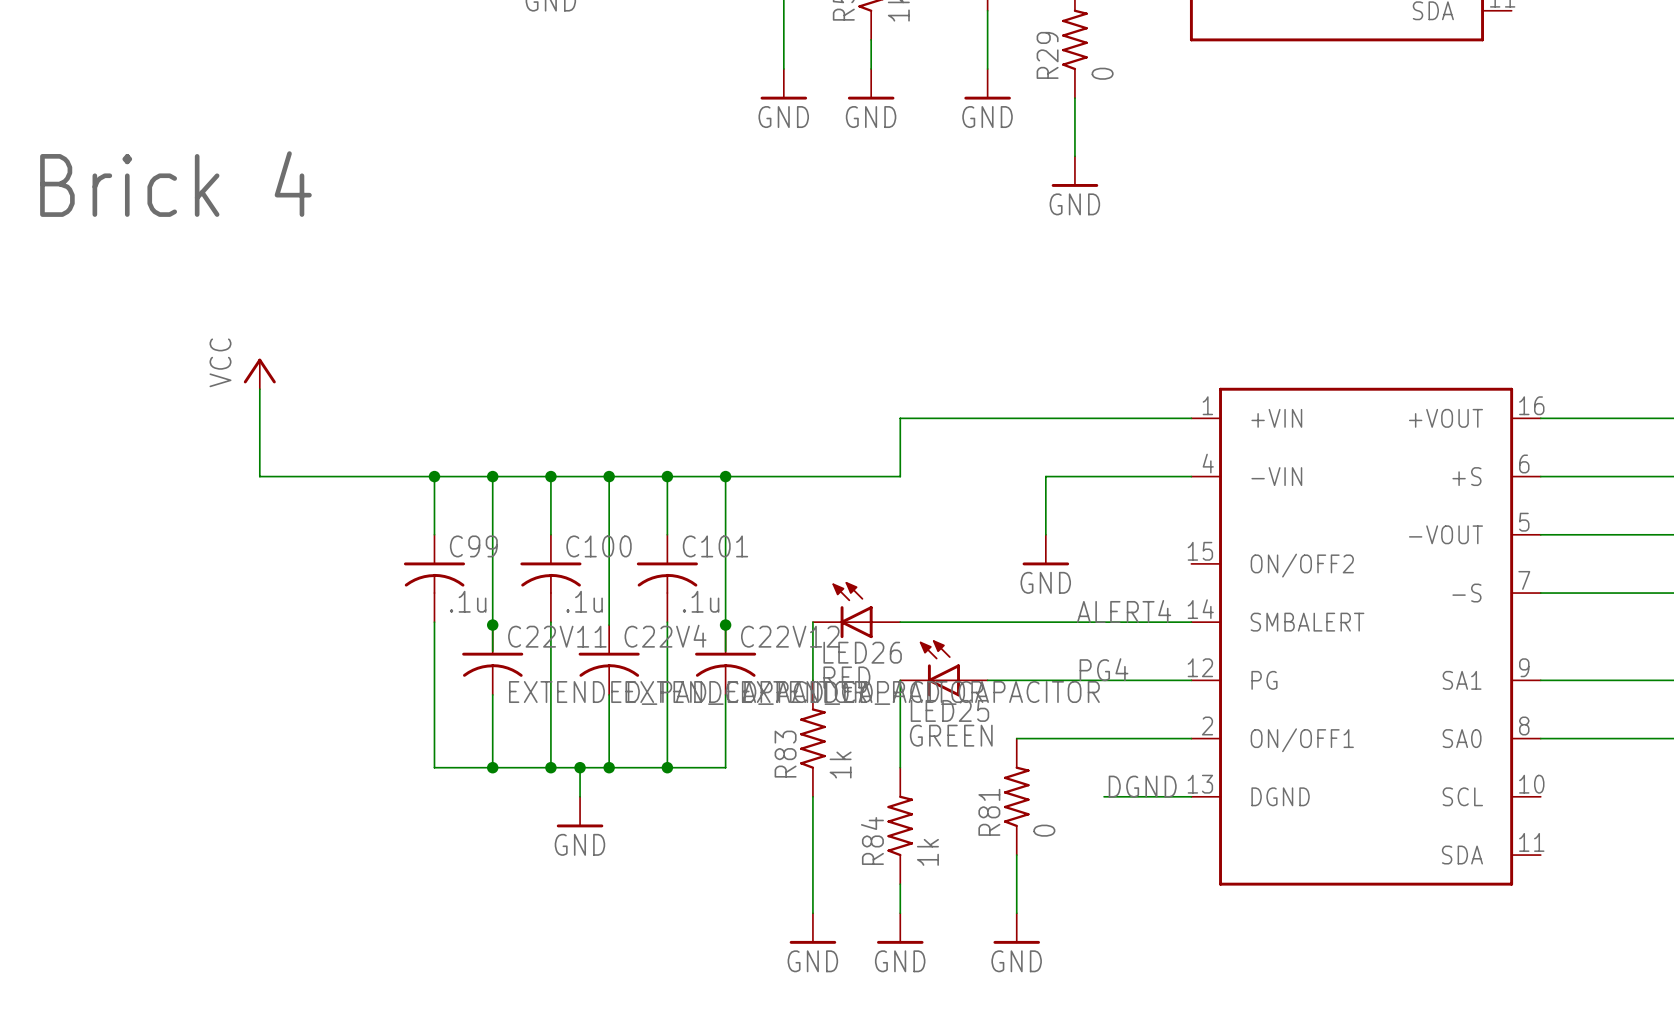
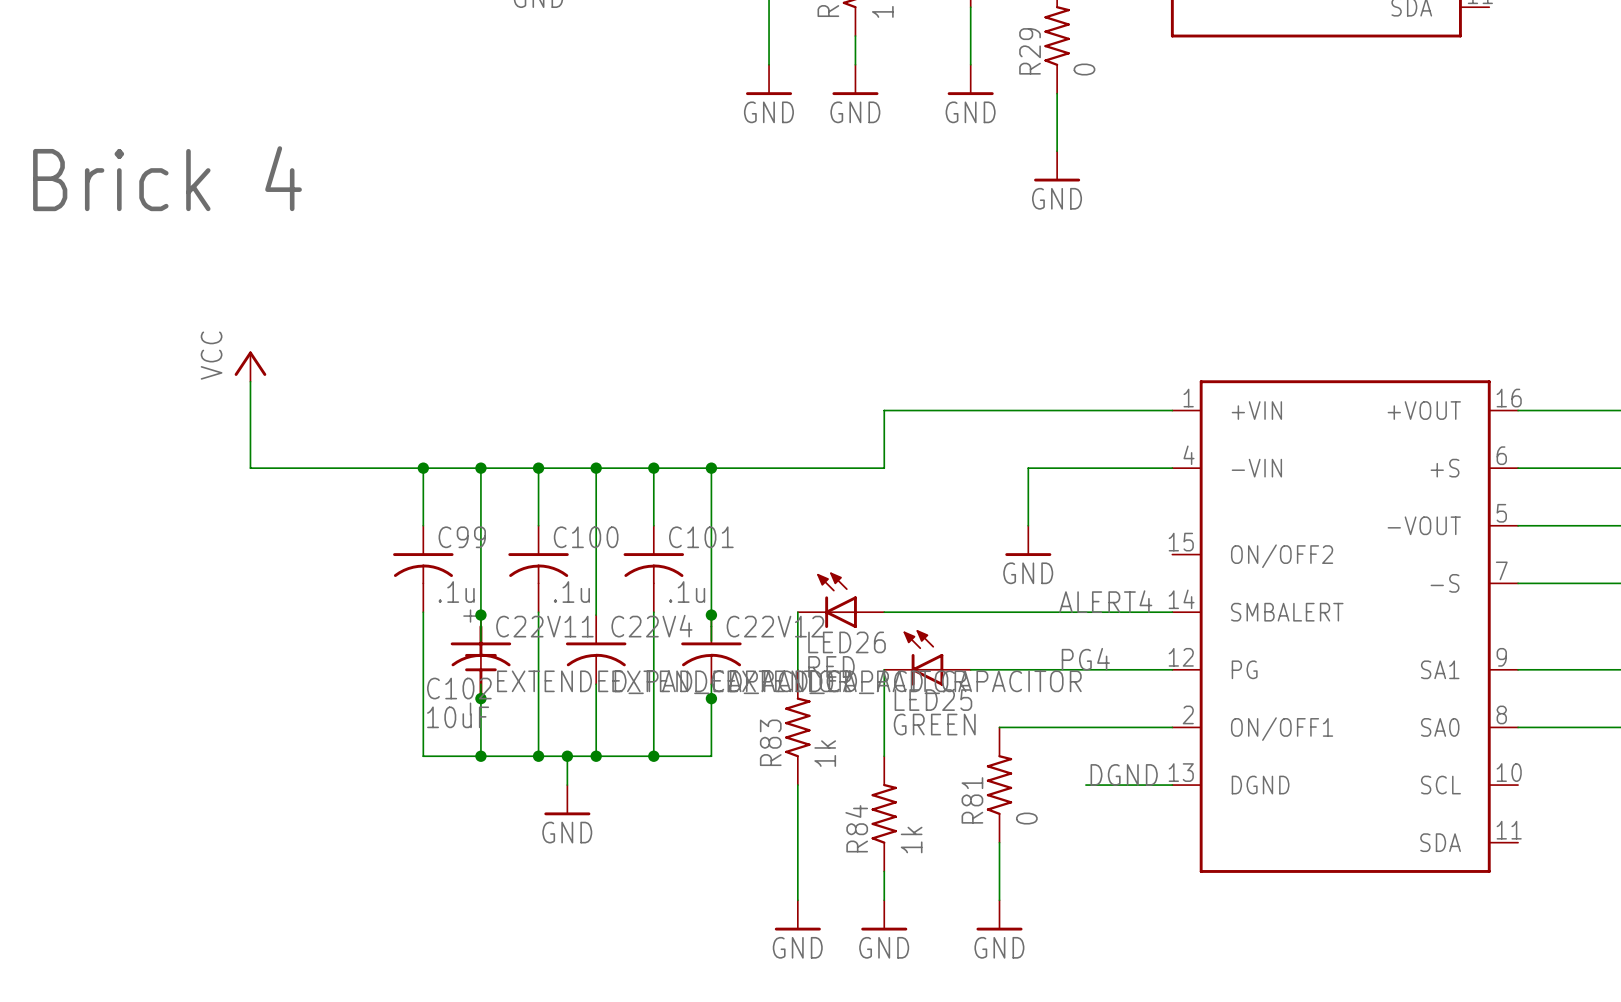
C102: none -> 10uF (480, 662)
junction: none -> (480, 698)
junction: none -> (711, 698)

